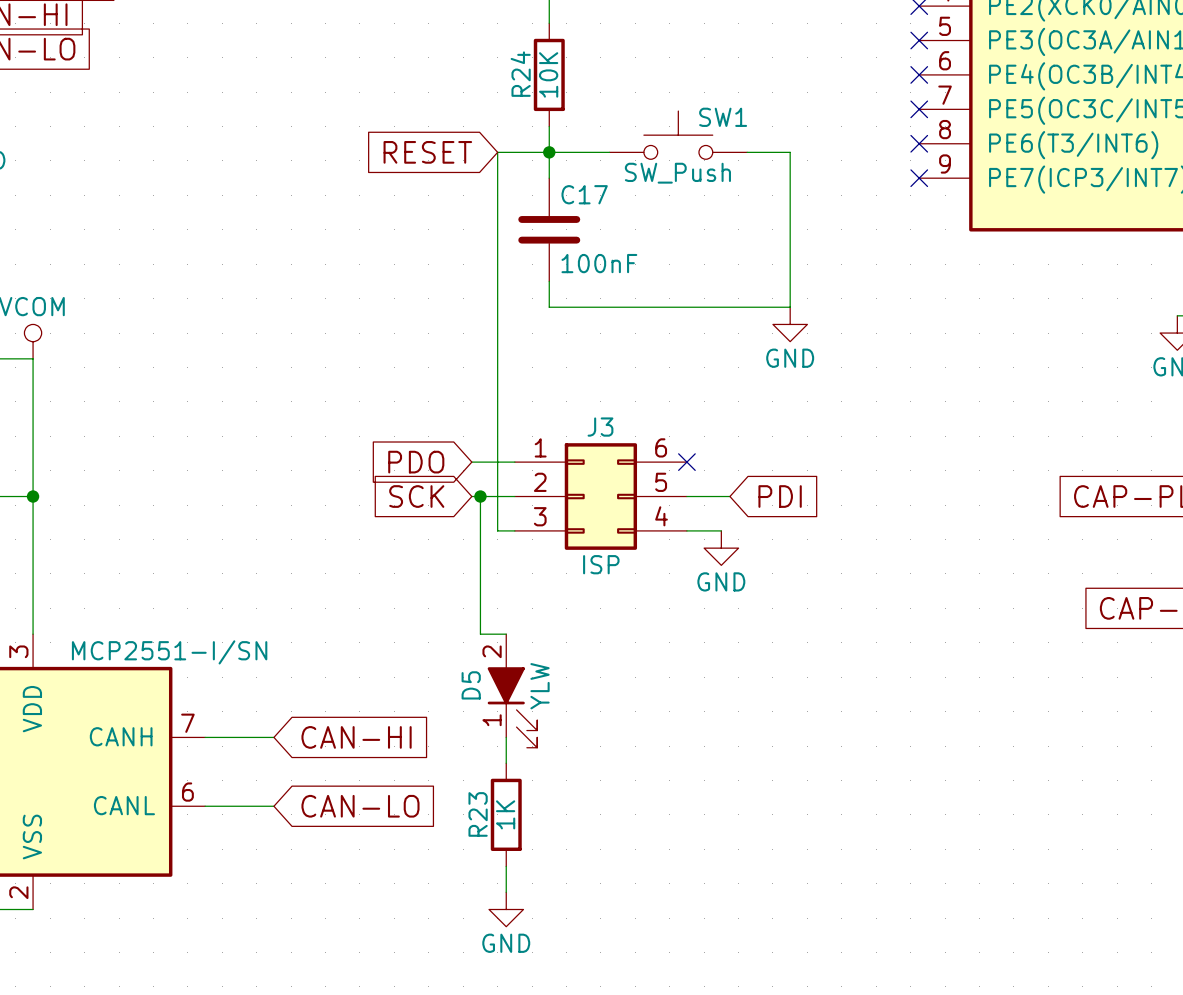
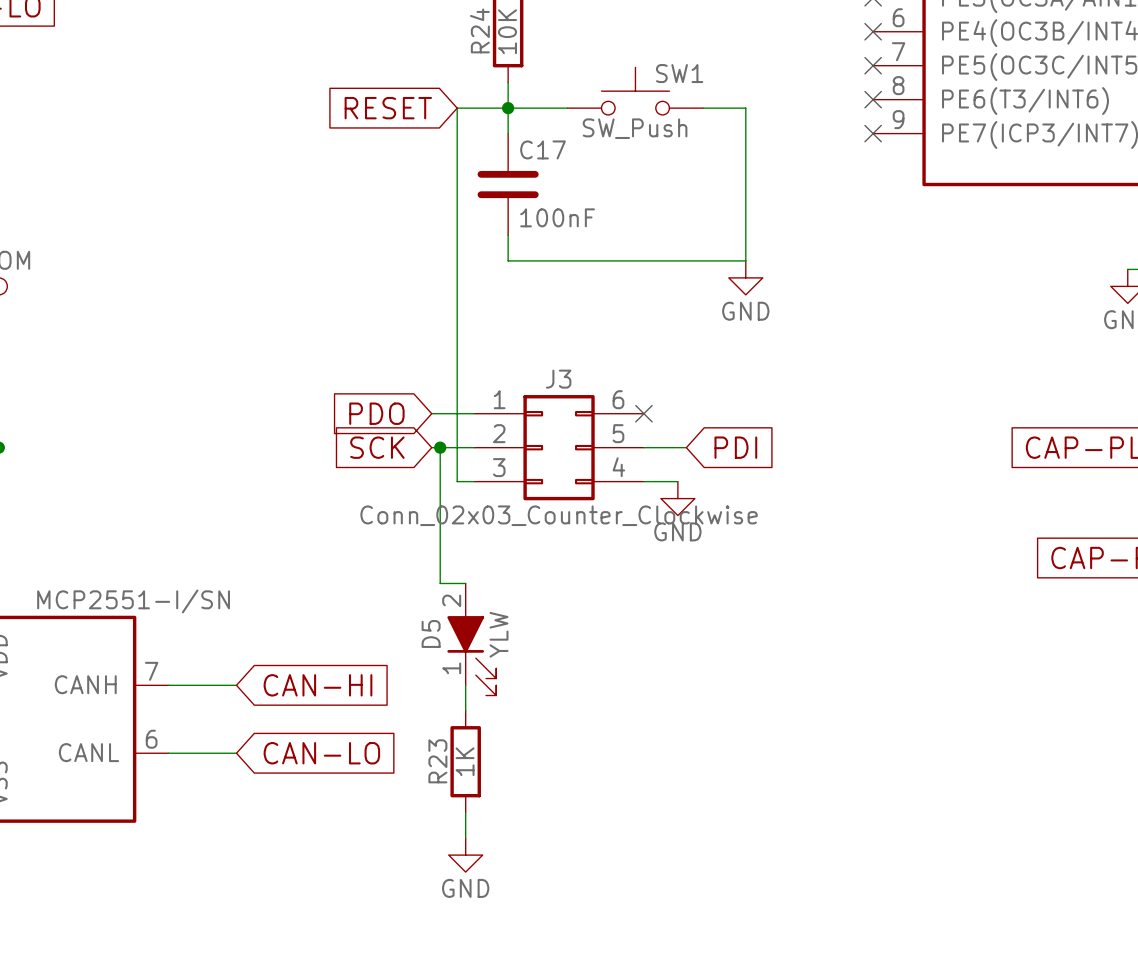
J3 value: ISP (601, 564) -> Conn_02x03_Counter_Clockwise (559, 515)

